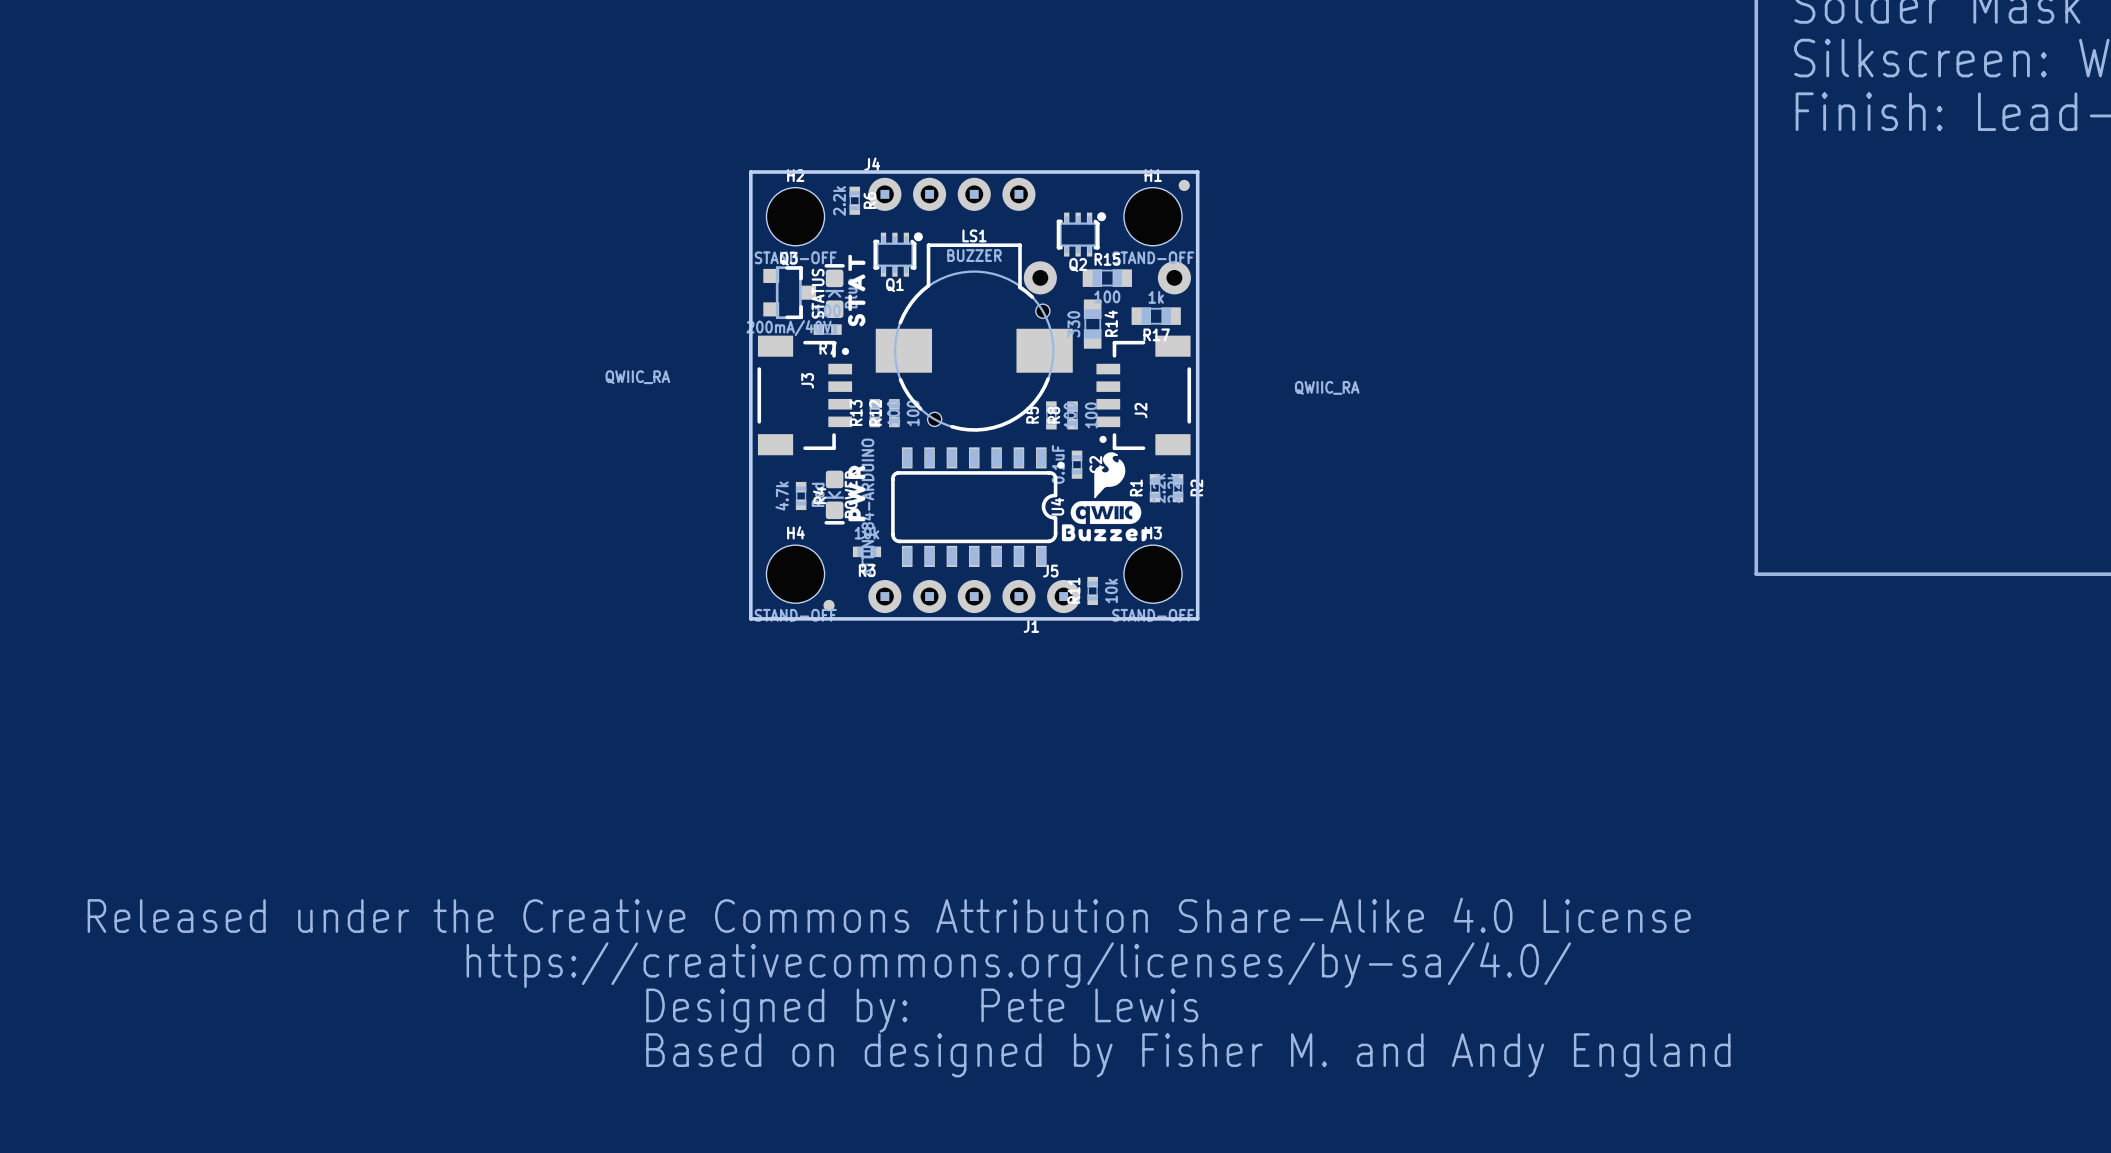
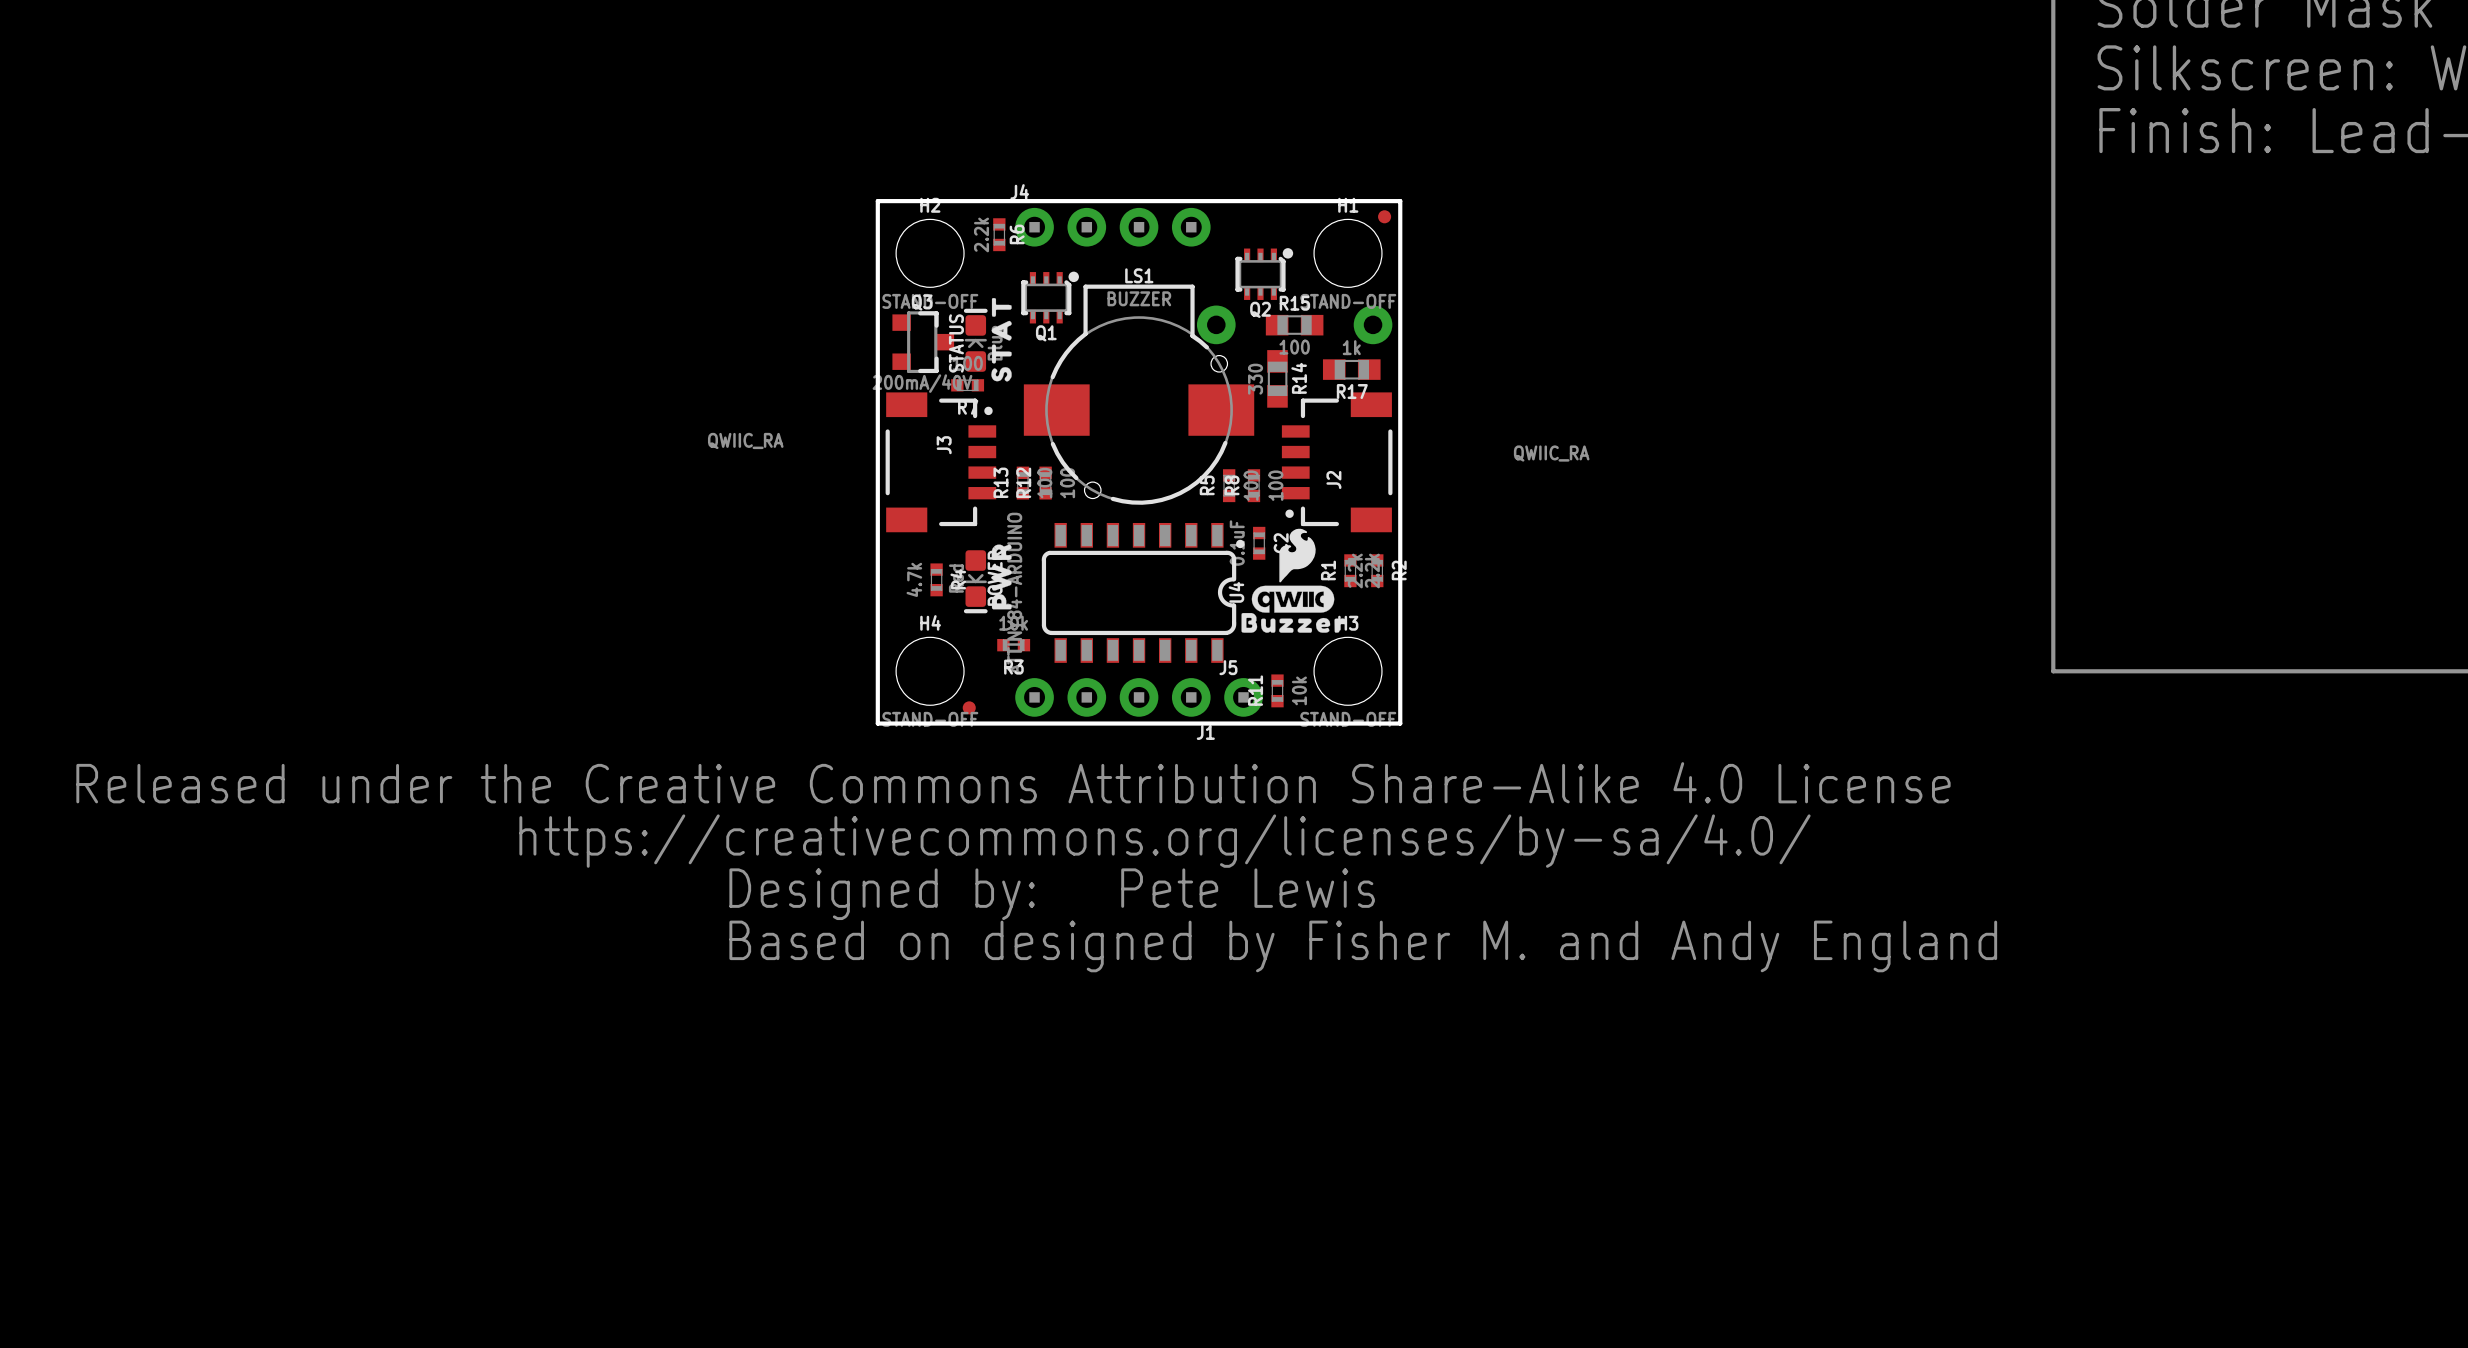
drawing position: (889, 965) -> (1013, 841)
text position: Pete Lewis (1089, 1005) -> Pete Lewis (1248, 888)
text position: Based on designed by Fisher M. and Andy England (1188, 1055) -> Based on designed by Fisher M. and Andy England (1363, 946)

